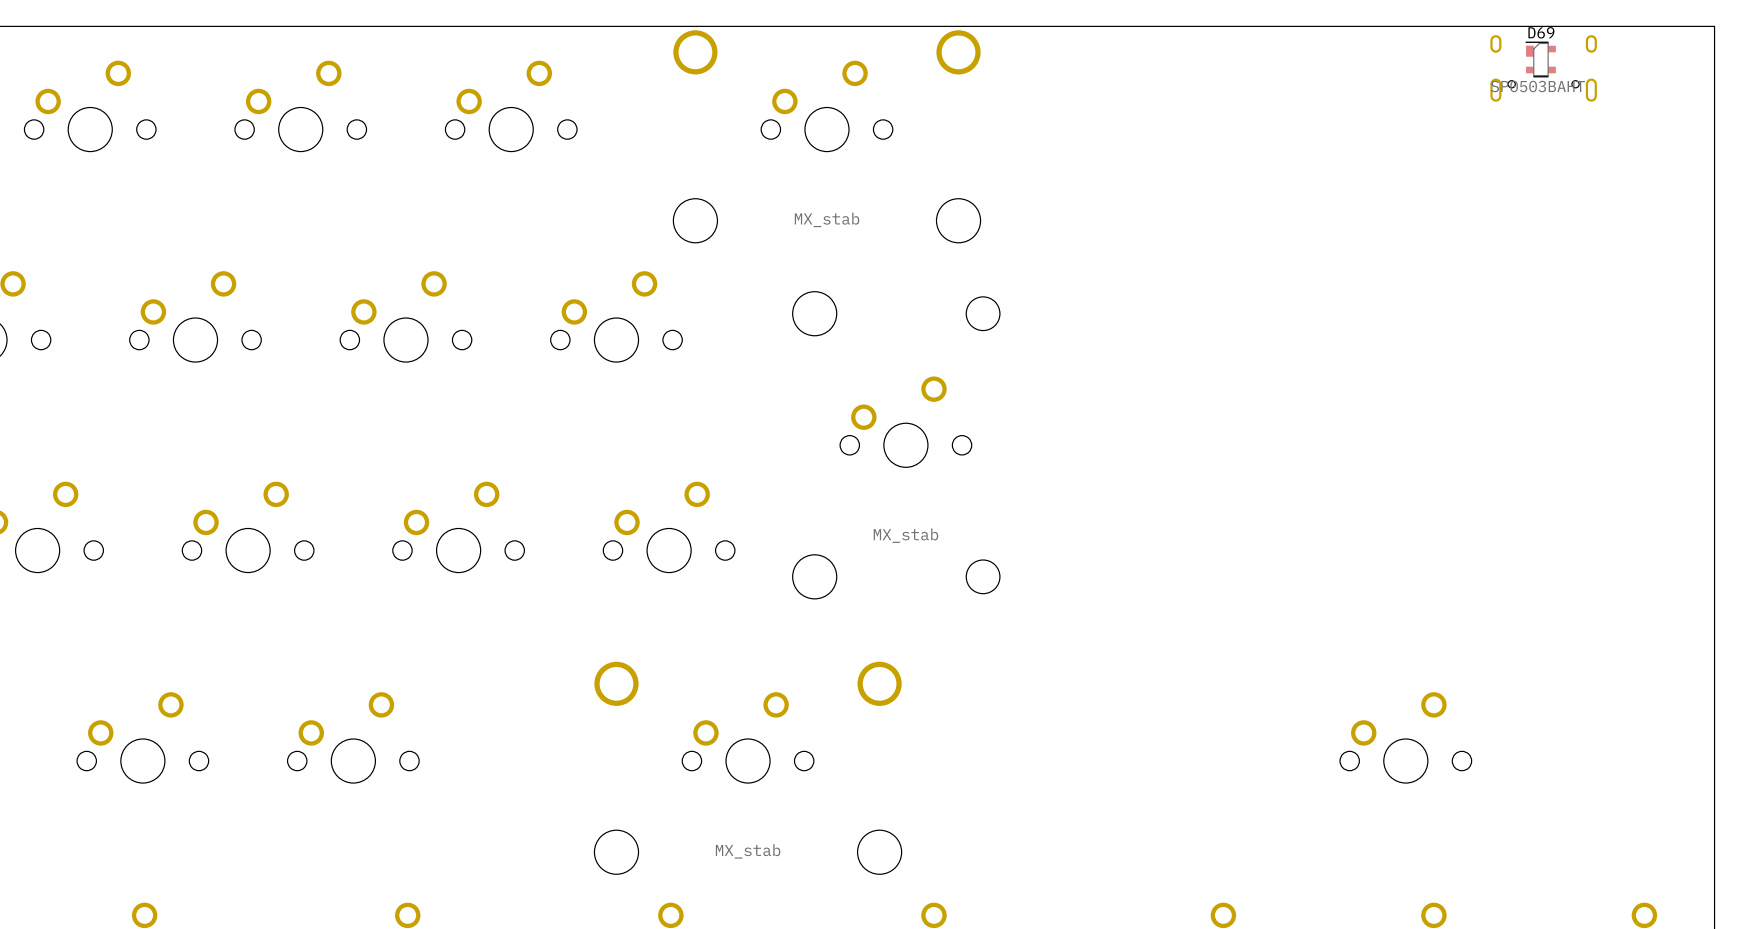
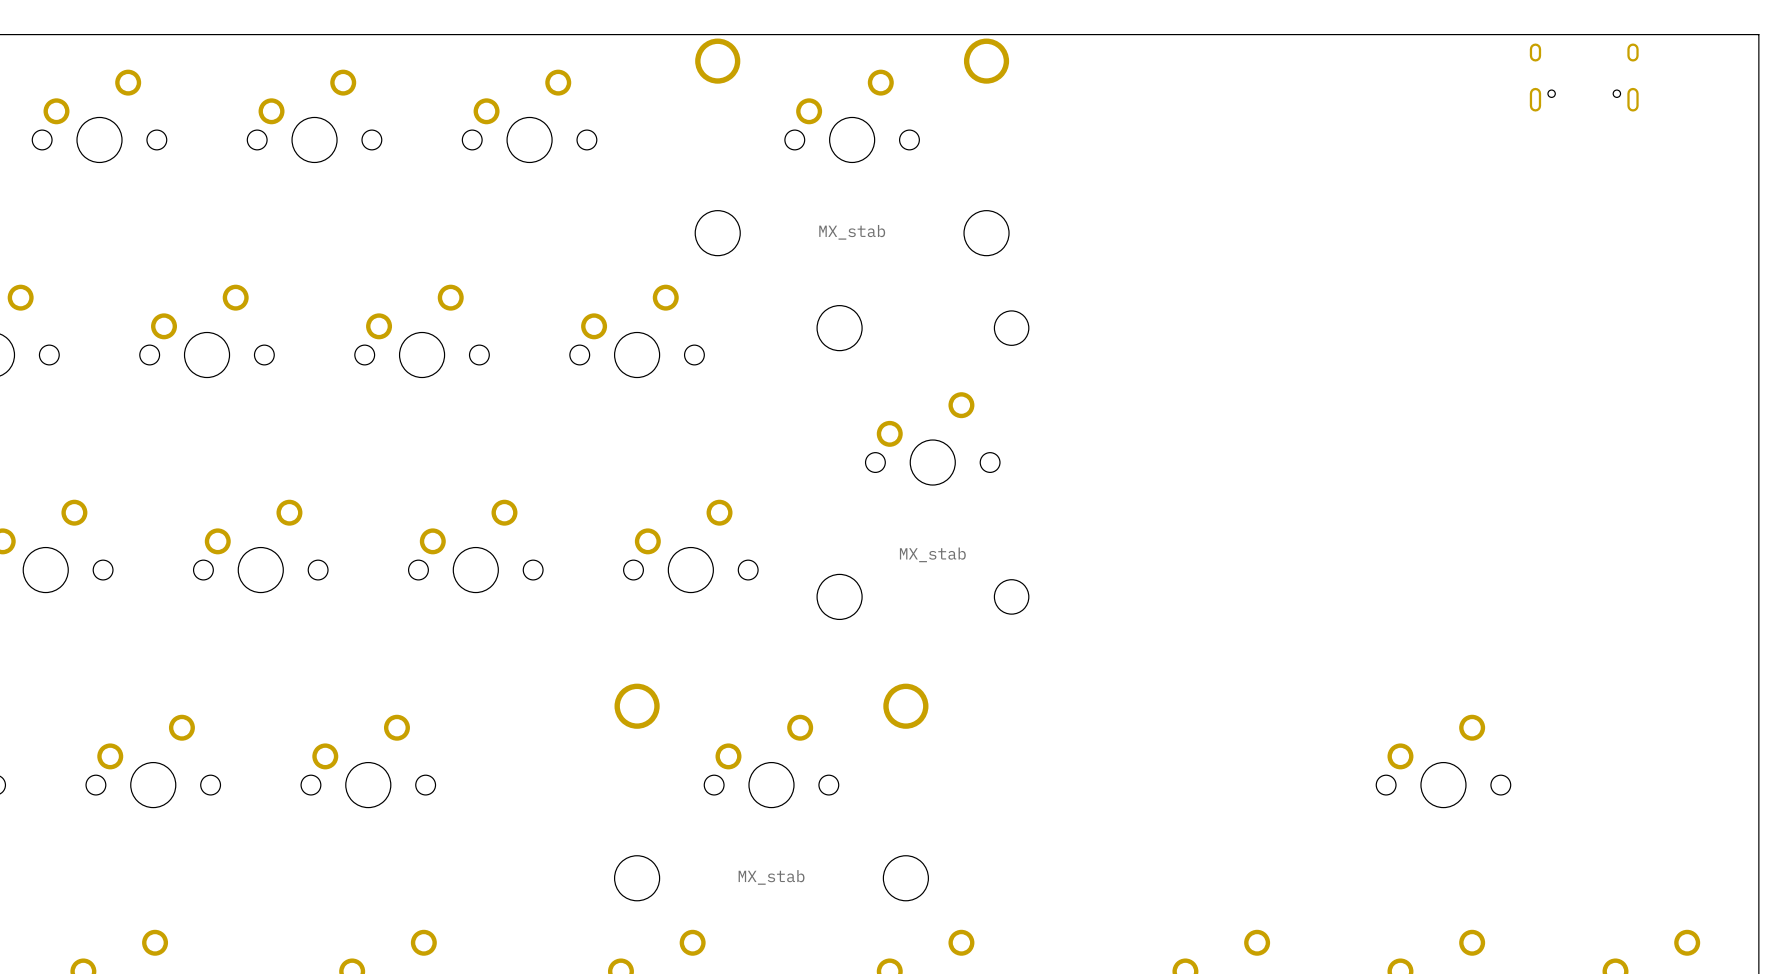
D69: SP0503BAHT (1540, 59) -> none

